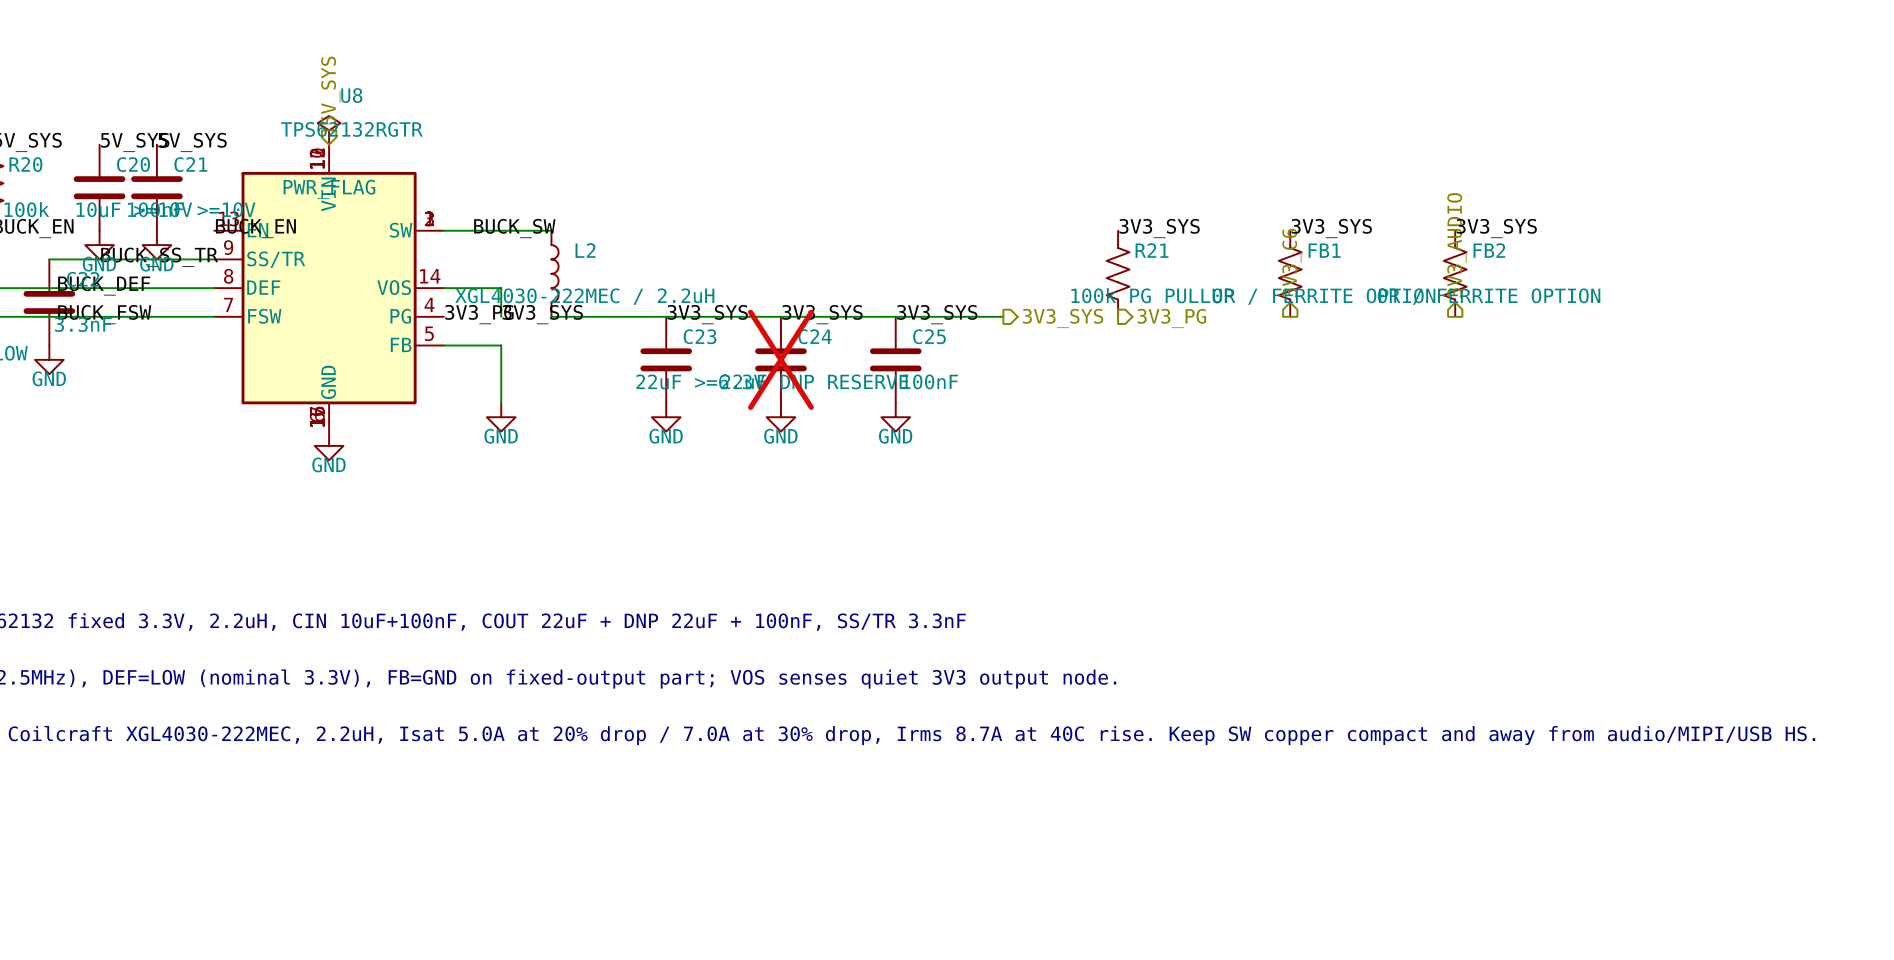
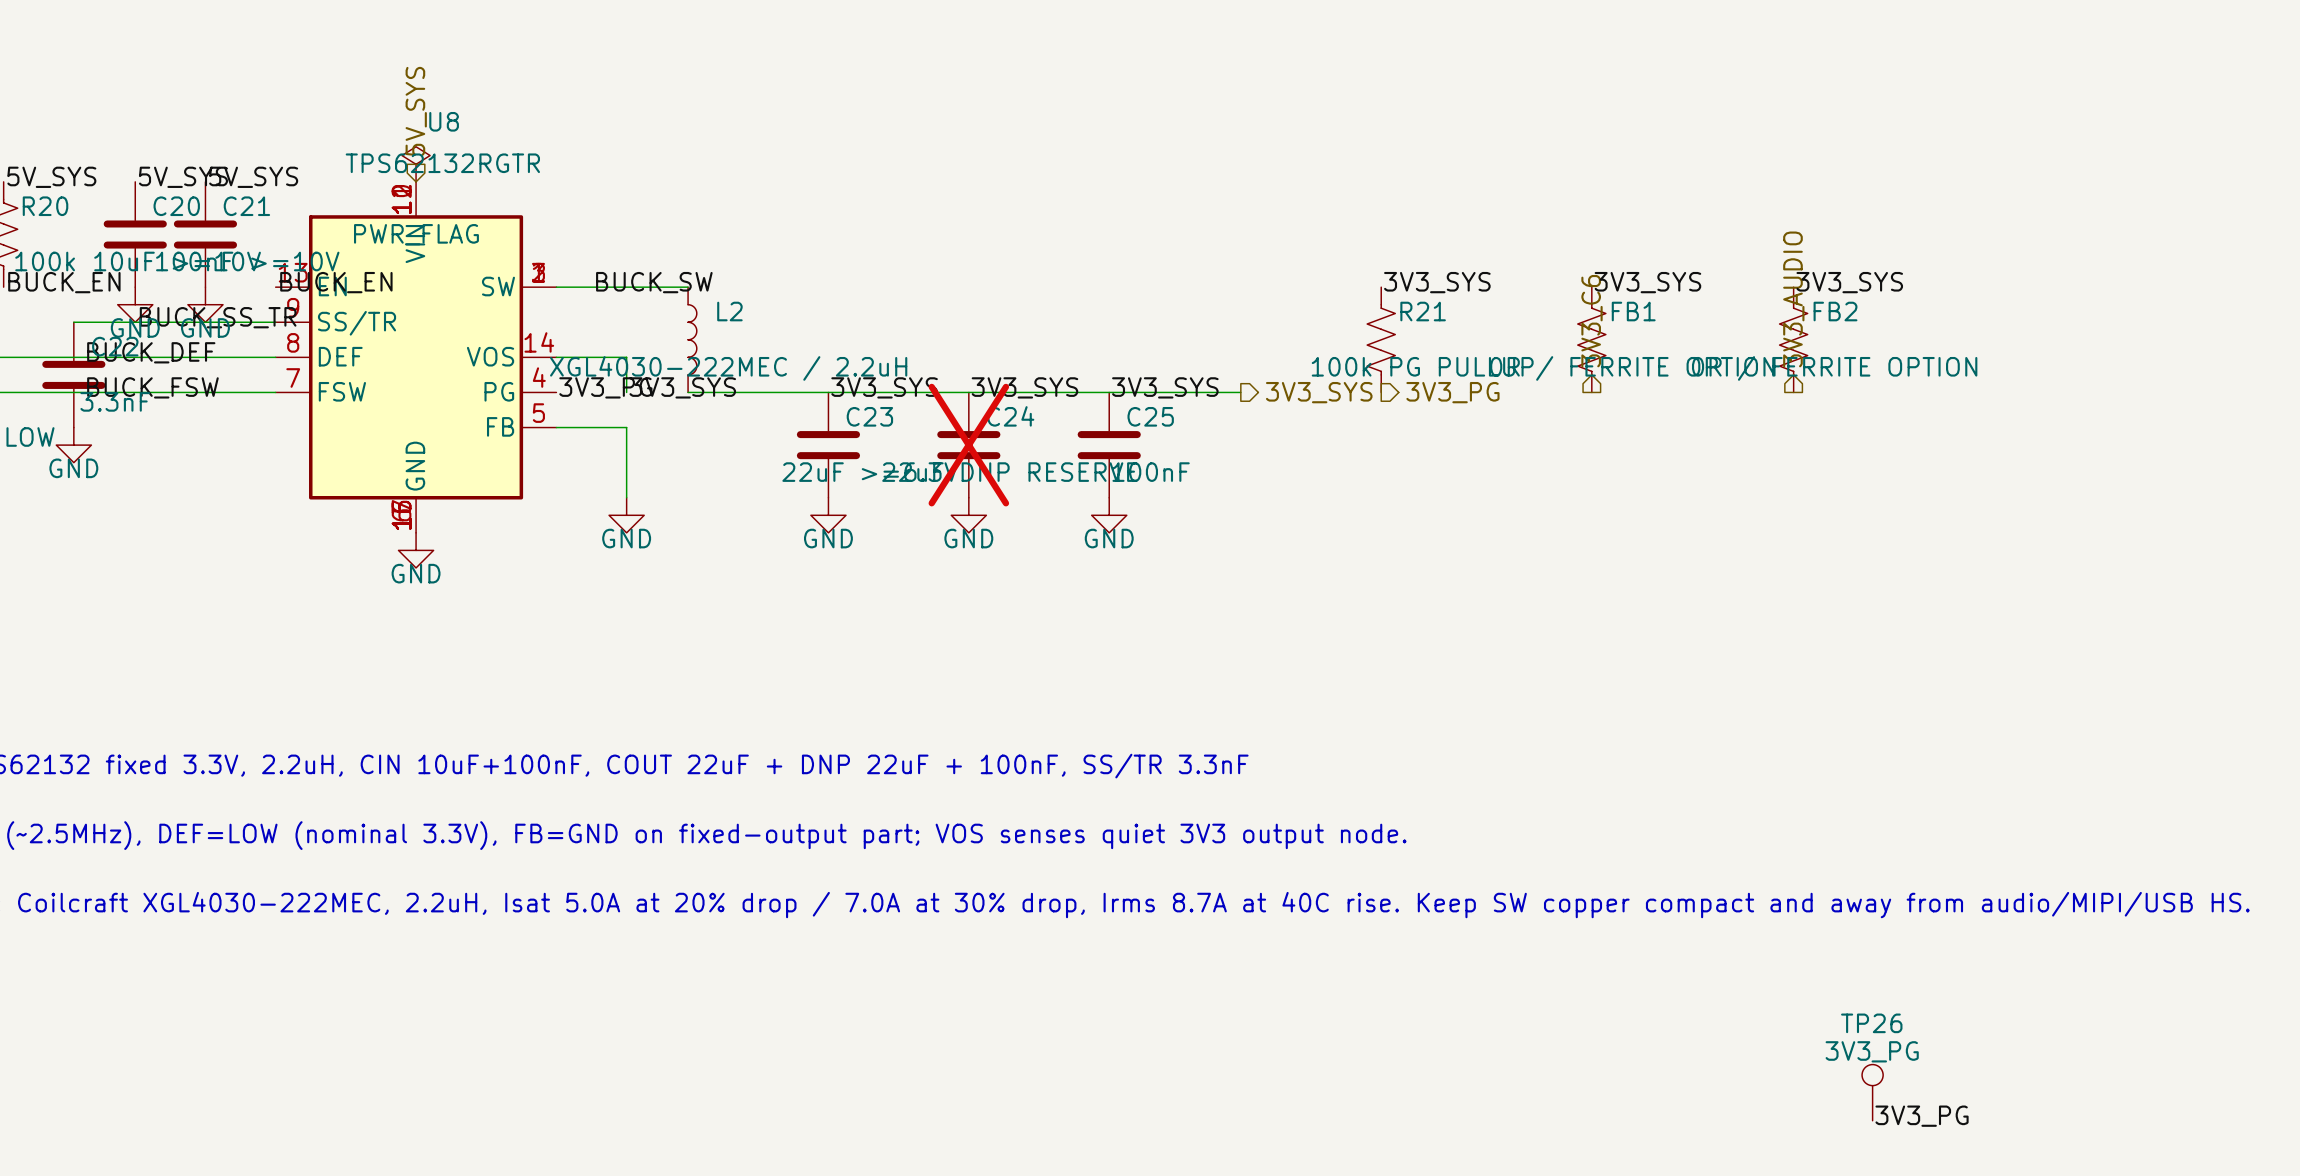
TP26: none -> 3V3_PG (1872, 1092)
label: none -> 3V3_PG (1922, 1116)

